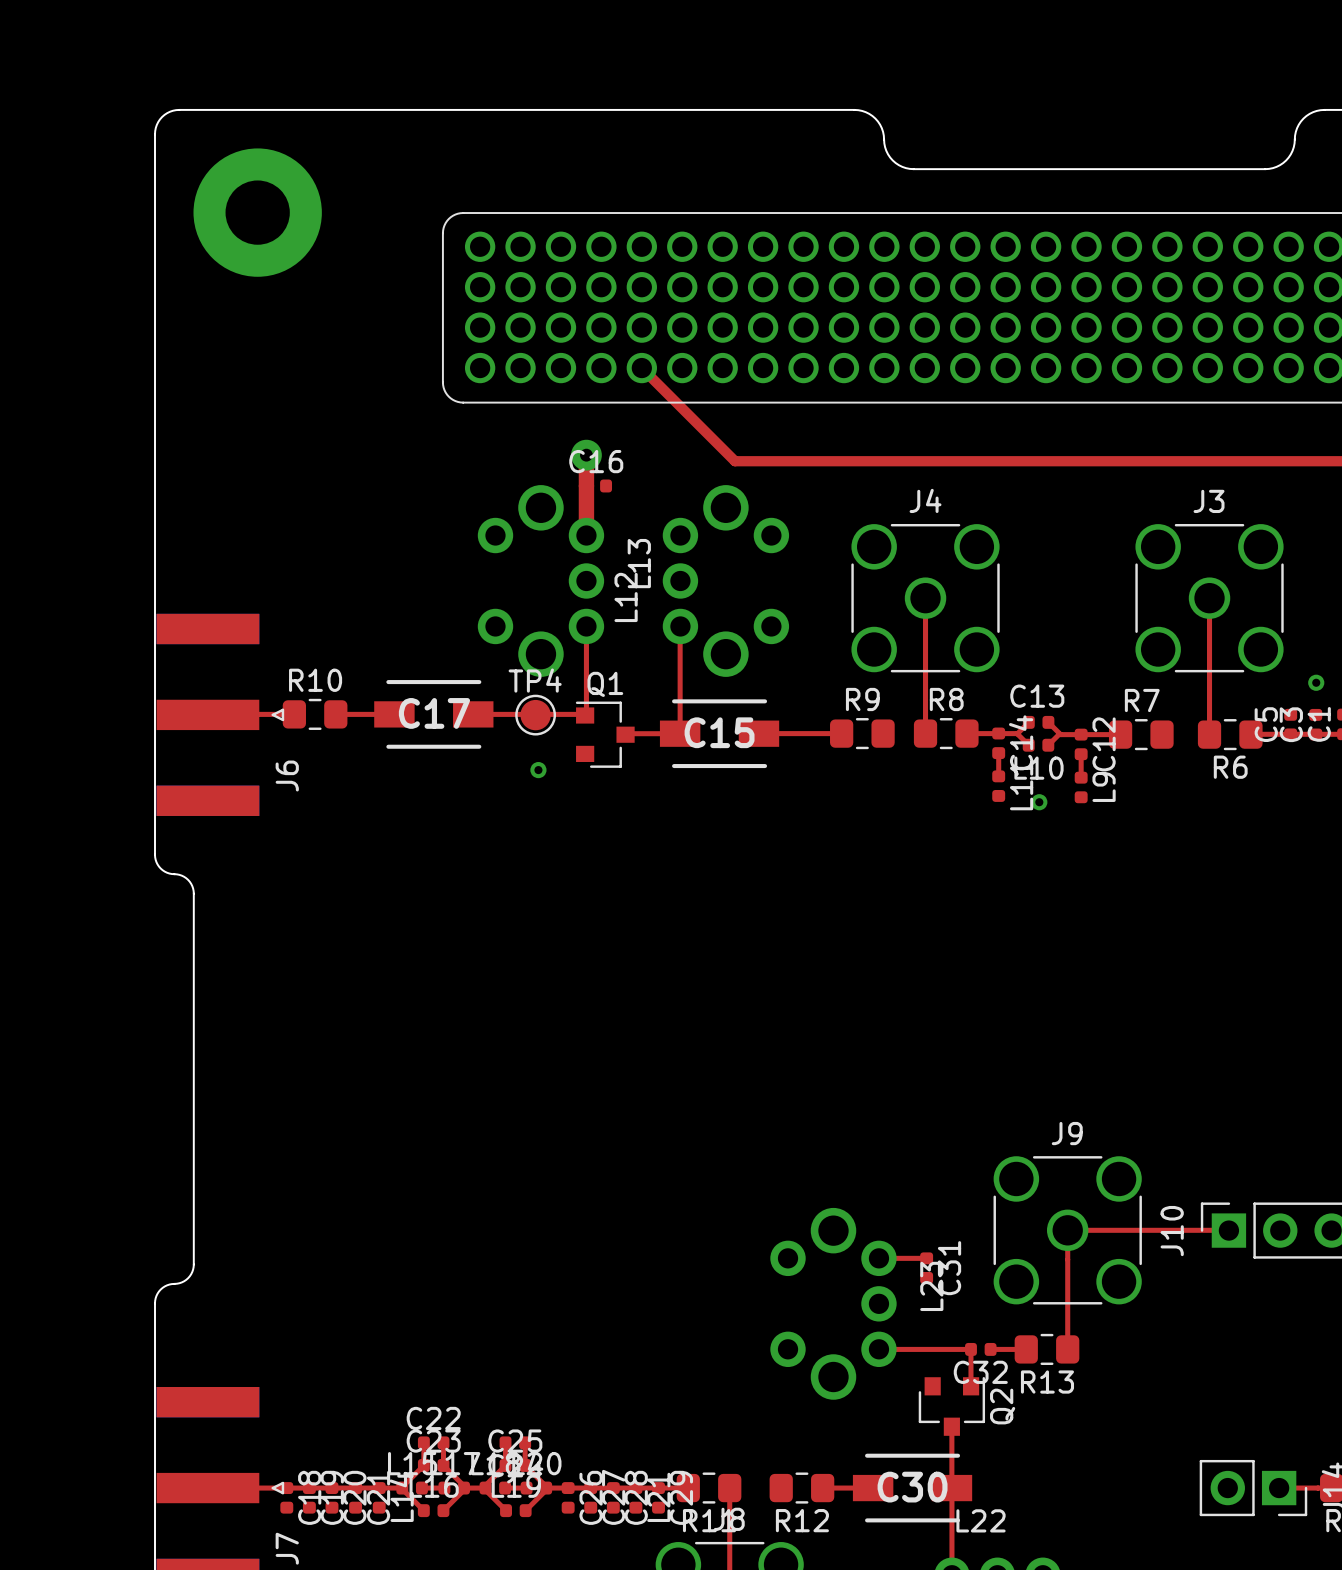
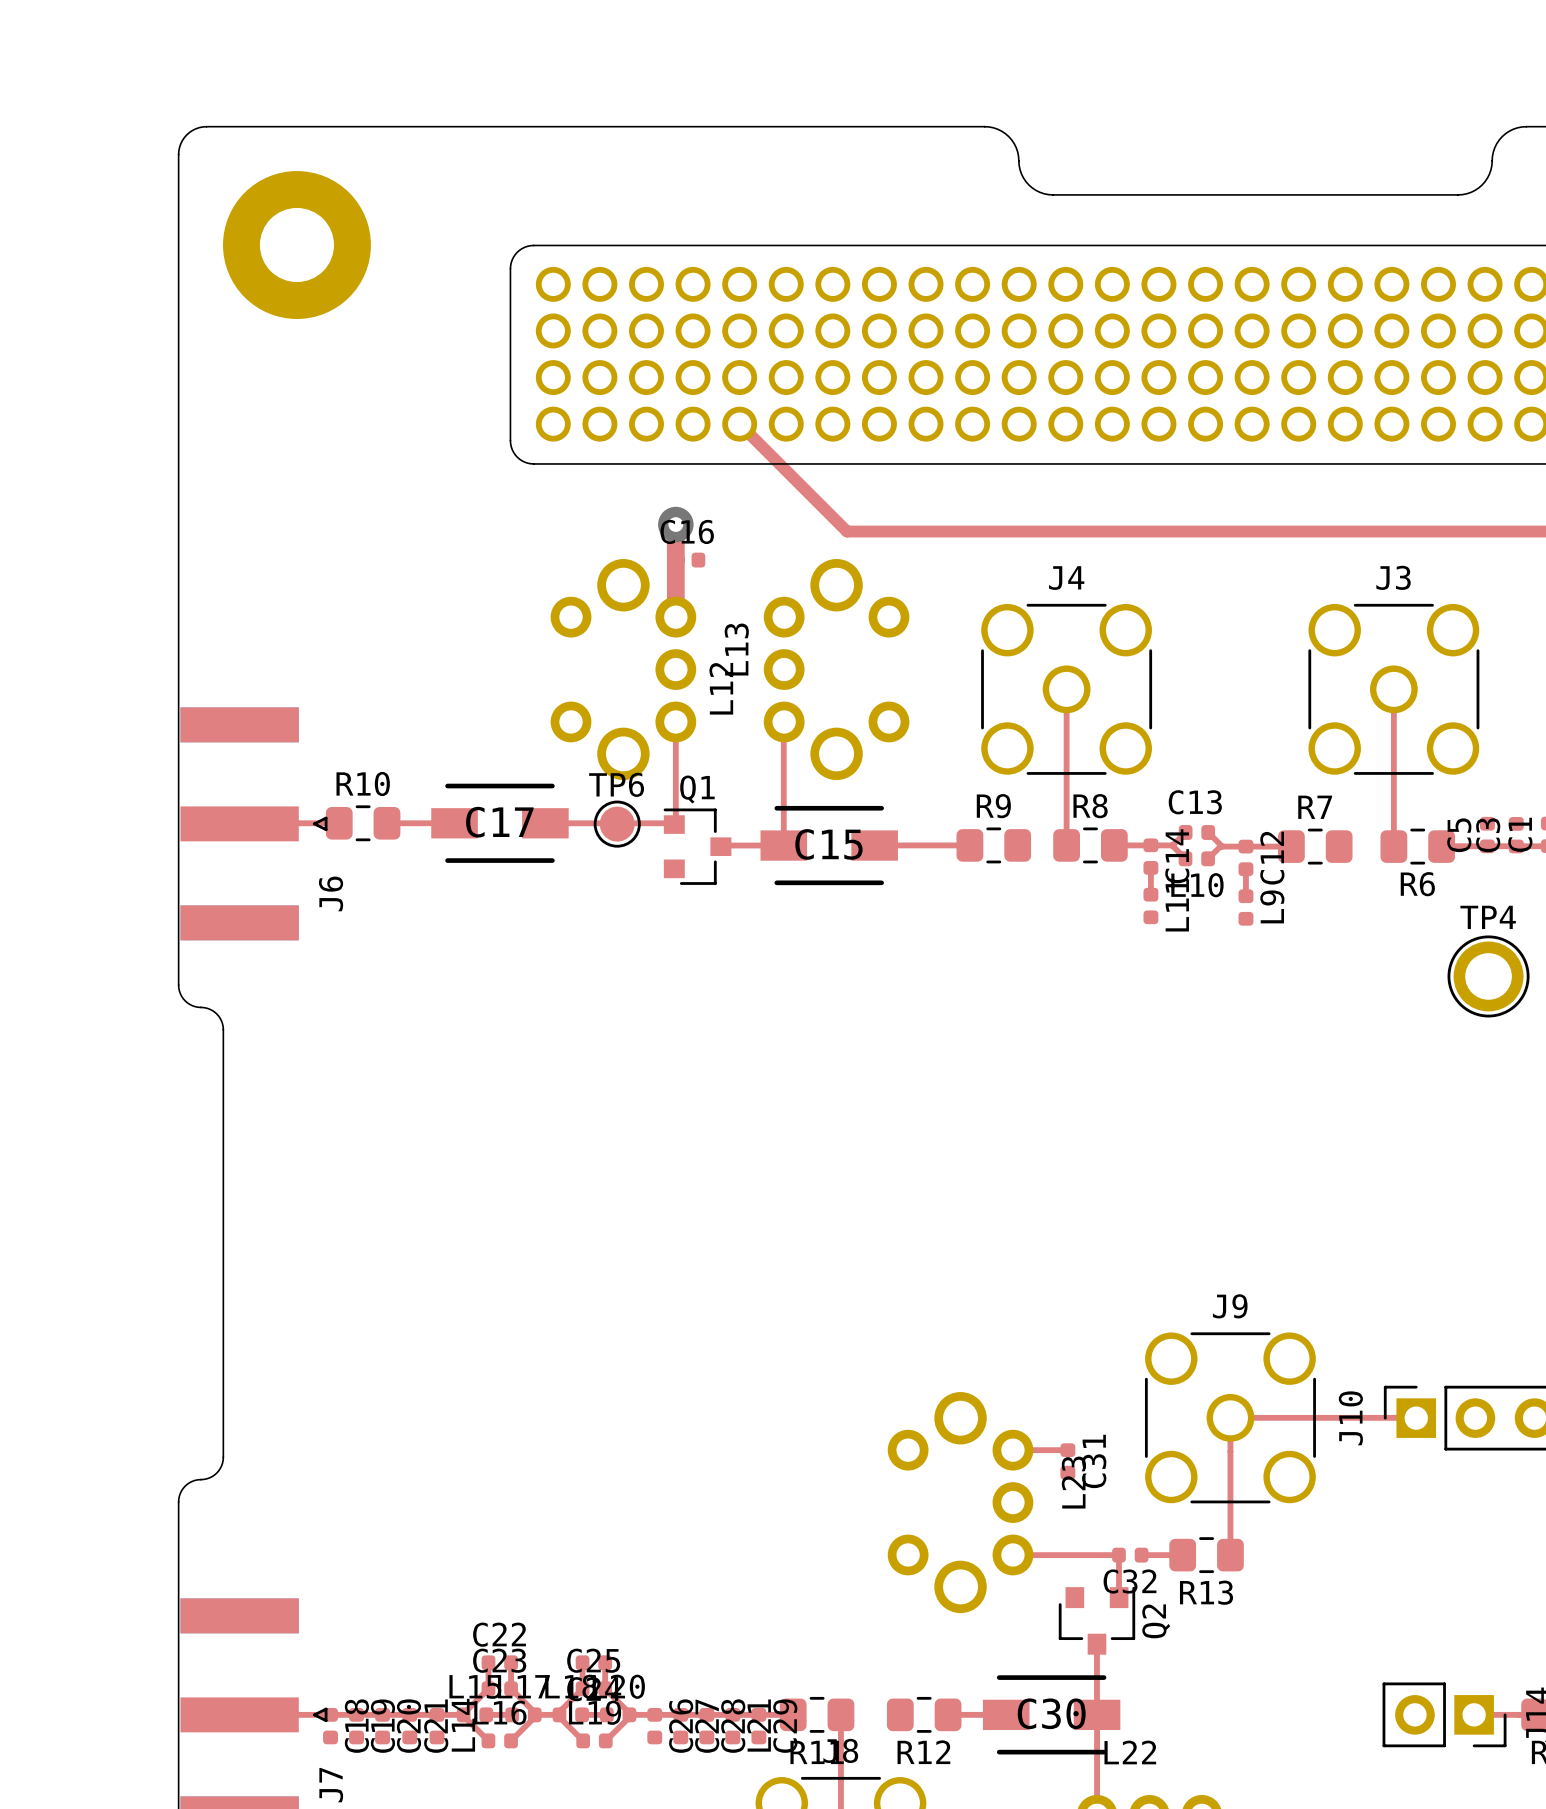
TP4 name: TP4 (535, 680) -> TP6 (616, 784)
via: (1316, 682) -> none
via: (538, 770) -> none
via: (1039, 802) -> none
TP4: none -> (1488, 976)

